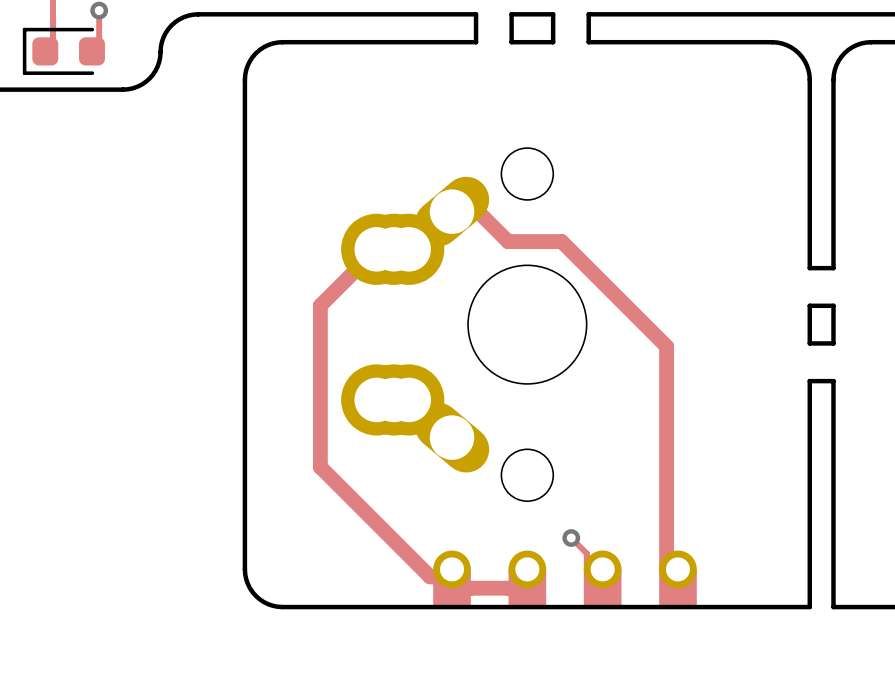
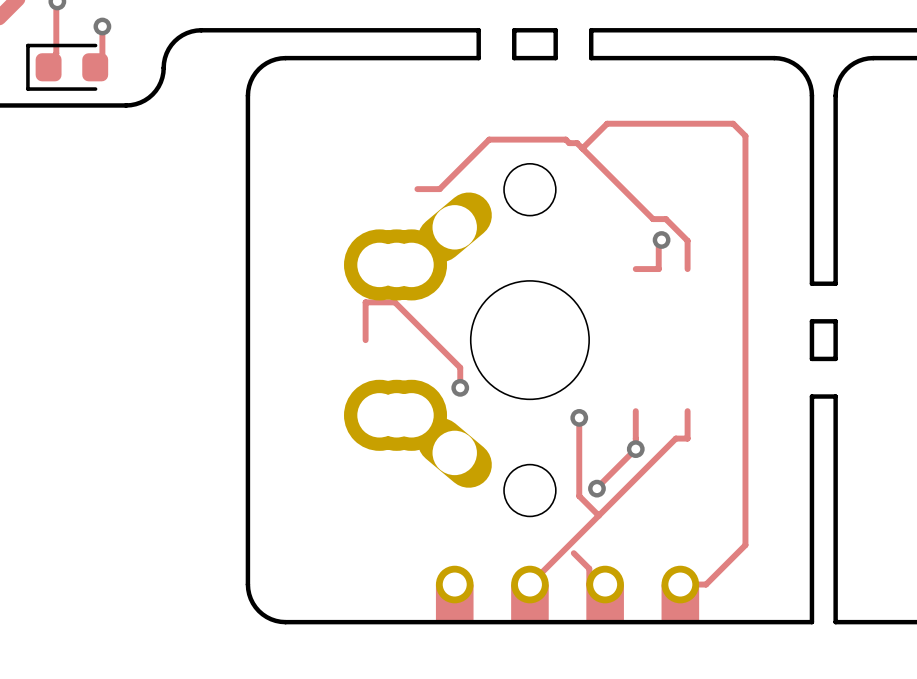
track: none -> (582, 148) (577, 143) (569, 143) (565, 139) (489, 139) (439, 189) (417, 189)
track: none -> (582, 148) (653, 219) (665, 219) (687, 240) (687, 269)
track: (452, 211) (466, 199) (508, 241) (561, 241) (666, 346) (666, 569) (677, 588) -> (582, 148) (607, 123) (733, 123) (745, 136) (745, 545) (706, 584) (680, 584) (680, 603)
track: none -> (661, 239) (658, 242) (658, 269) (635, 269)
via: none -> (661, 239)
track: (376, 249) (320, 305) (320, 467) (430, 576) (440, 576) (452, 588) (527, 588) -> (687, 411) (687, 438) (675, 438) (529, 584) (529, 603)
track: none -> (365, 340) (365, 302) (394, 302) (460, 367) (460, 387)
via: none -> (460, 387)
track: none -> (635, 411) (635, 449) (596, 488)
track: none -> (579, 417) (579, 496) (598, 515)
via: none -> (579, 417)
via: none -> (635, 449)
via: none -> (596, 488)
via: (571, 538) -> none

